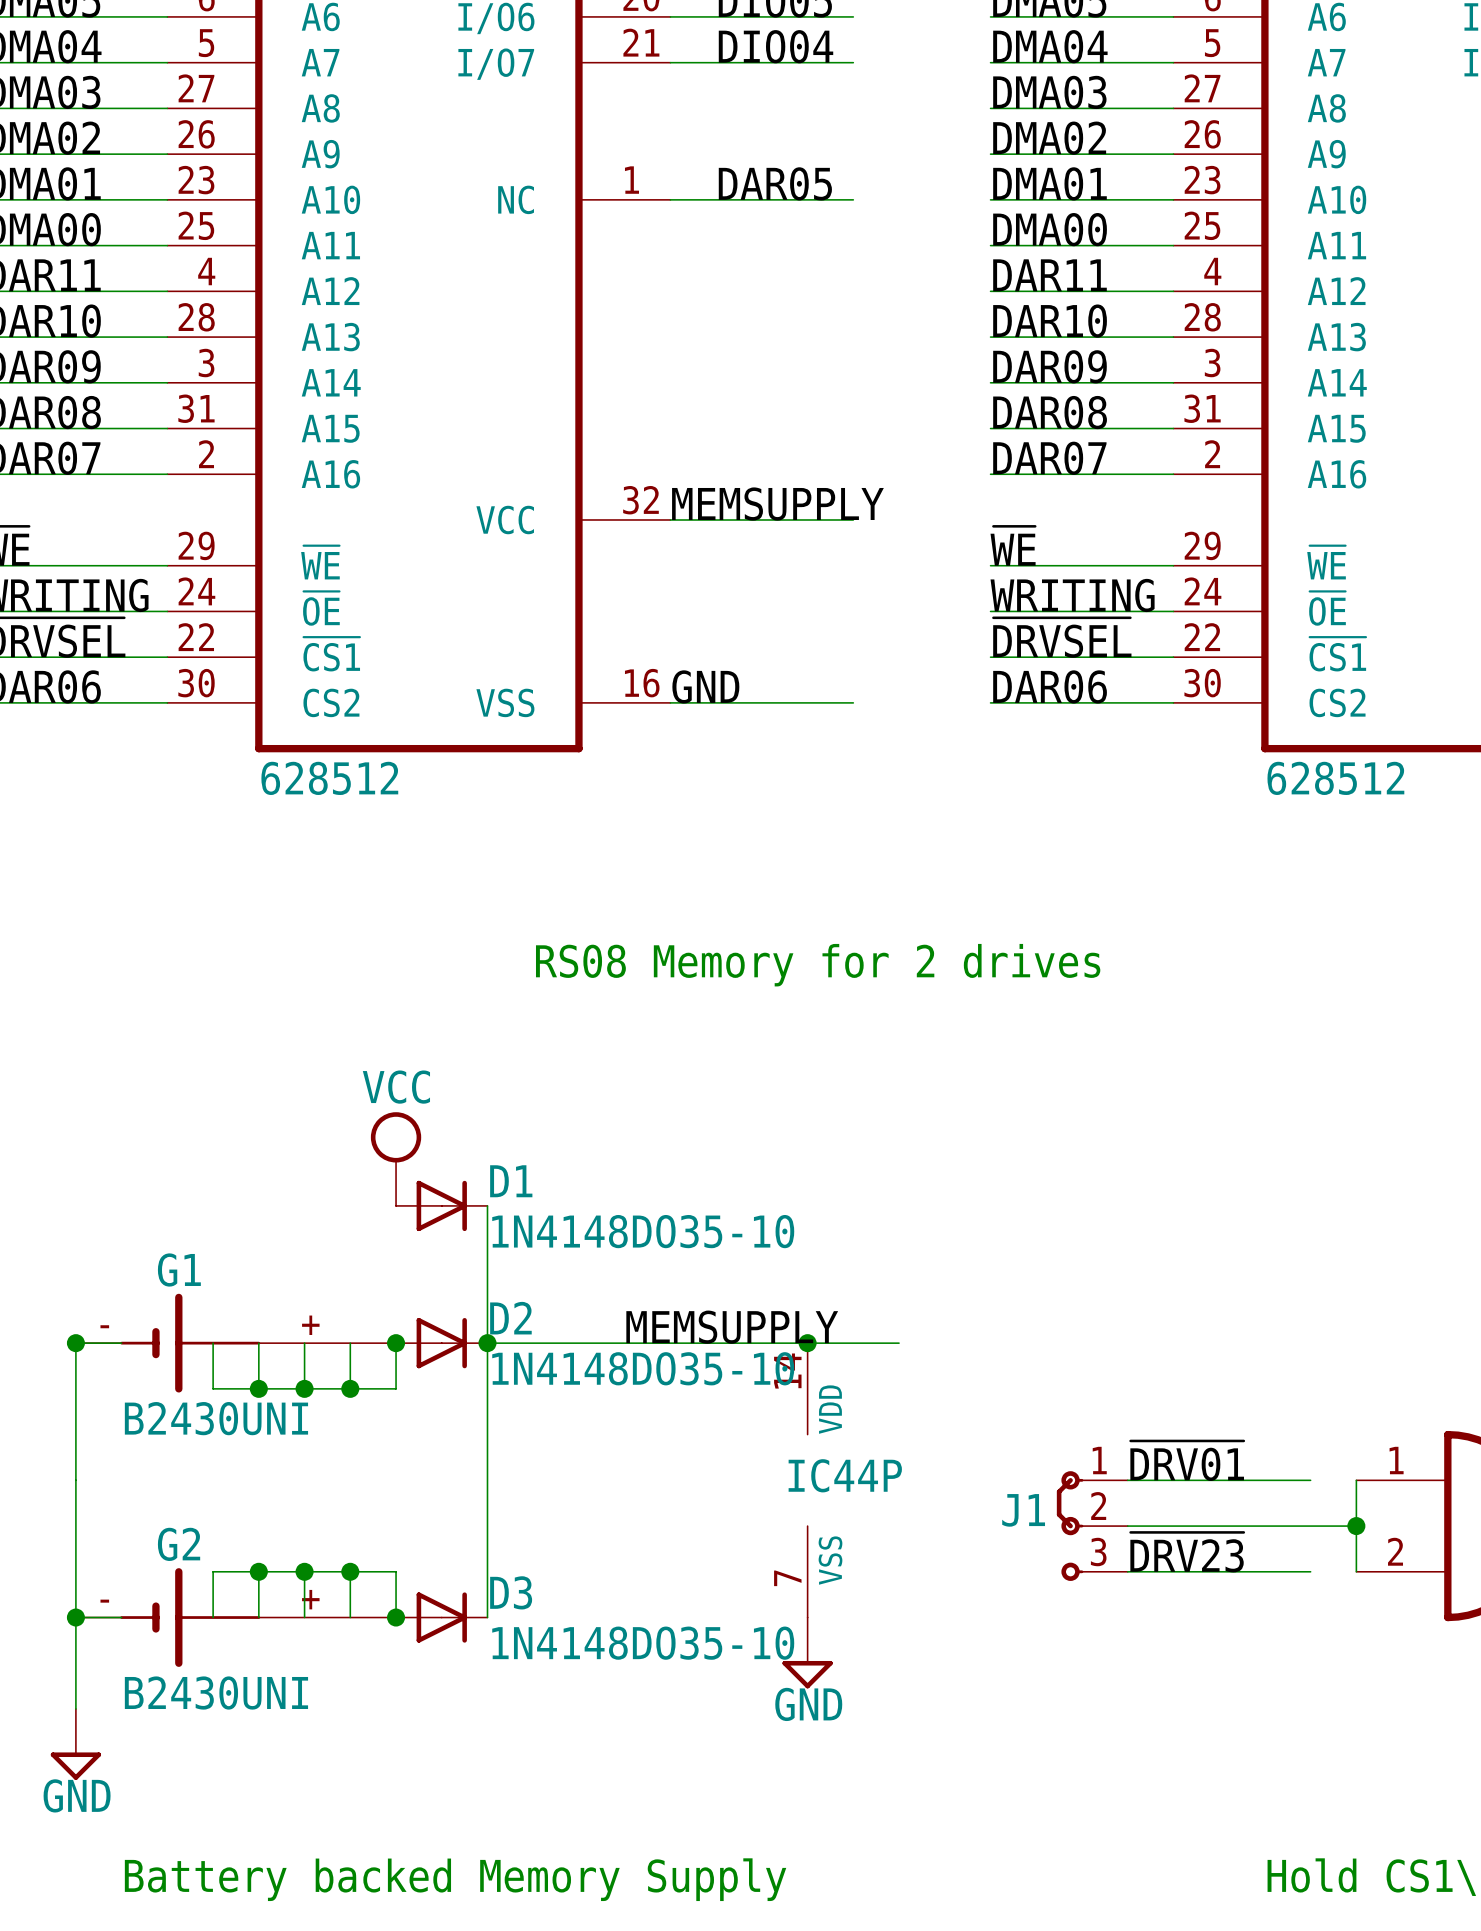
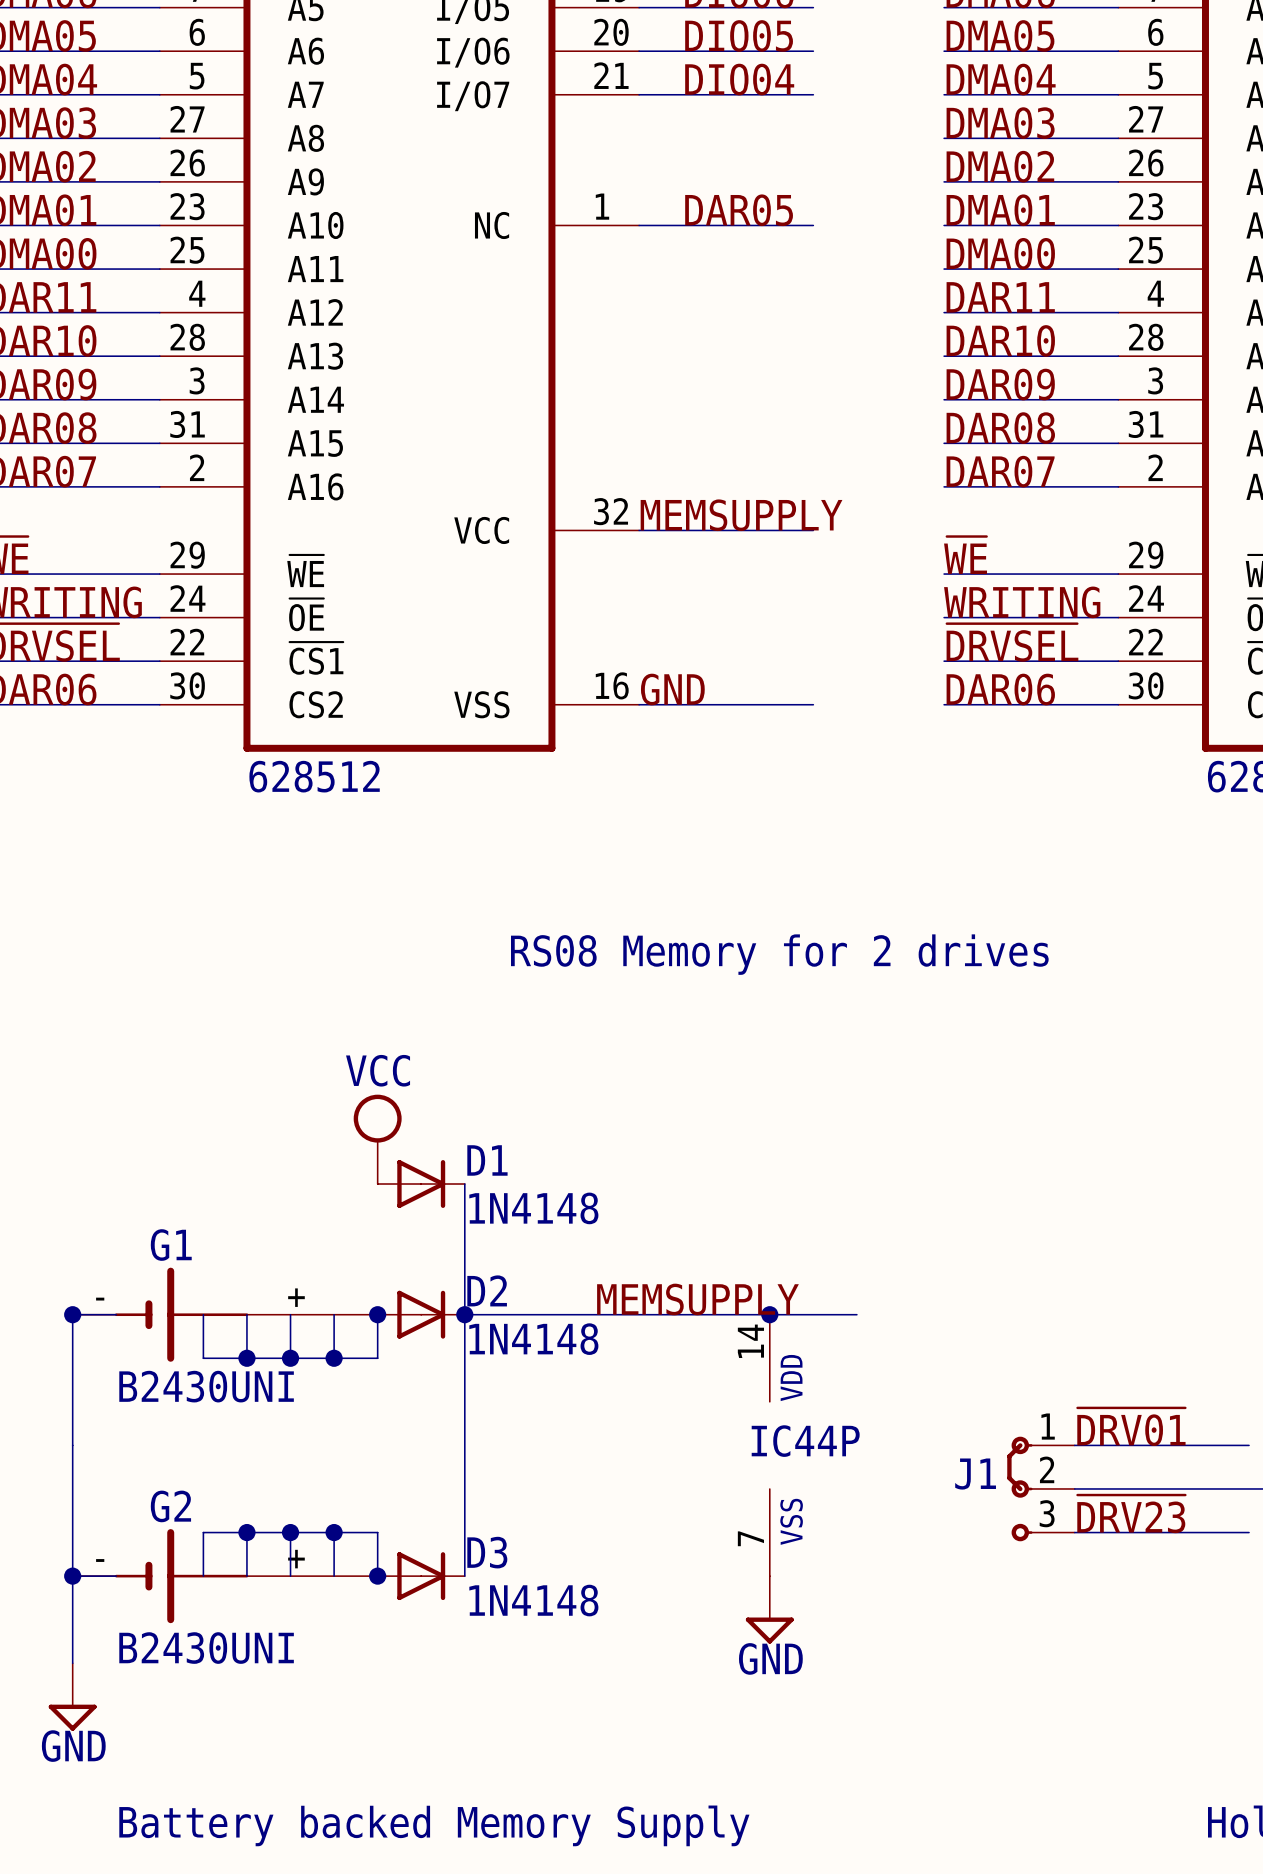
D1 value: 1N4148DO35-10 (643, 1231) -> 1N4148 (533, 1208)
D2 value: 1N4148DO35-10 (643, 1368) -> 1N4148 (533, 1339)
D3 value: 1N4148DO35-10 (643, 1643) -> 1N4148 (533, 1600)

